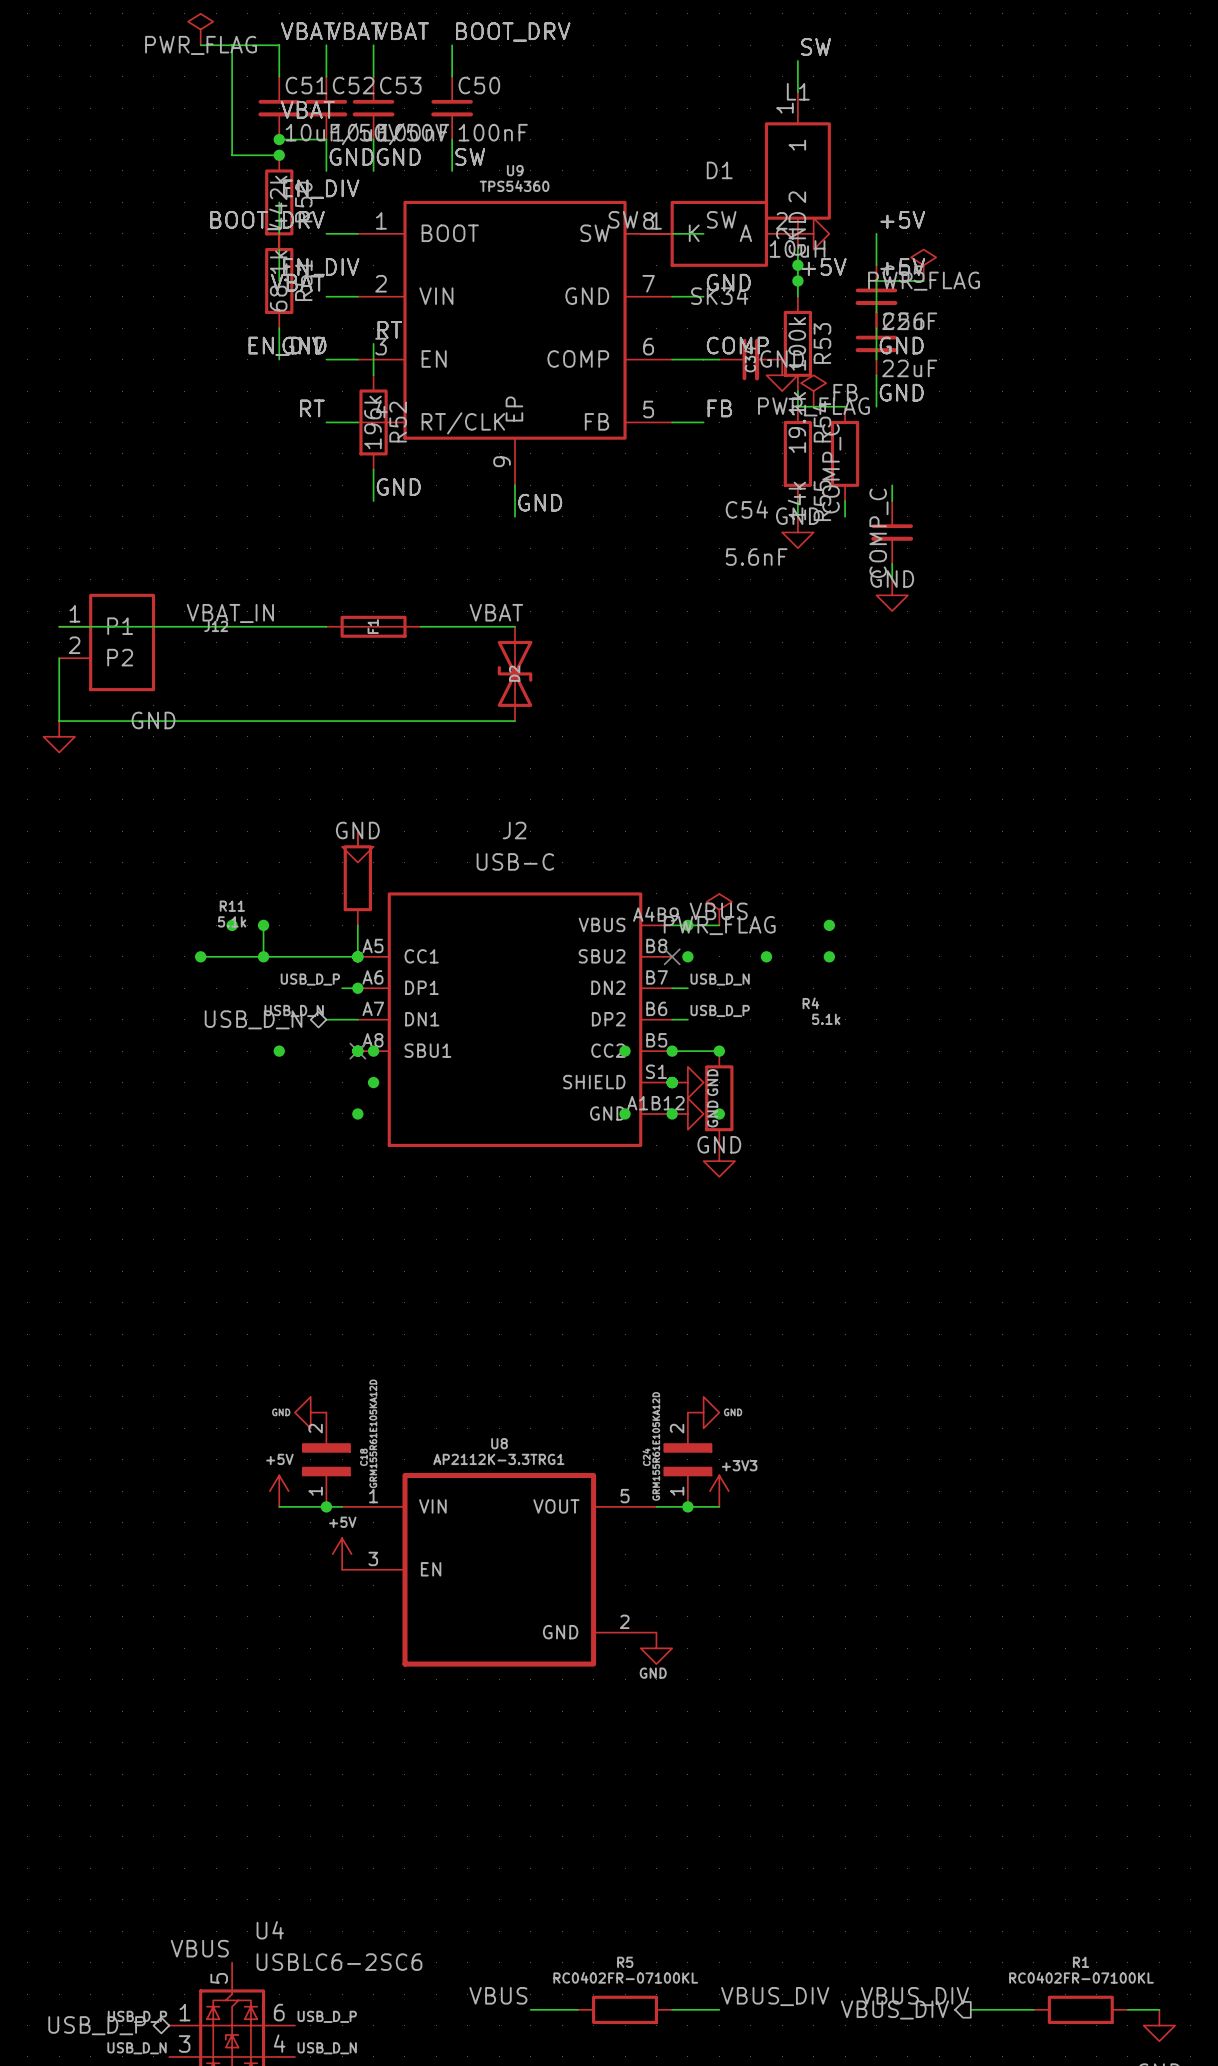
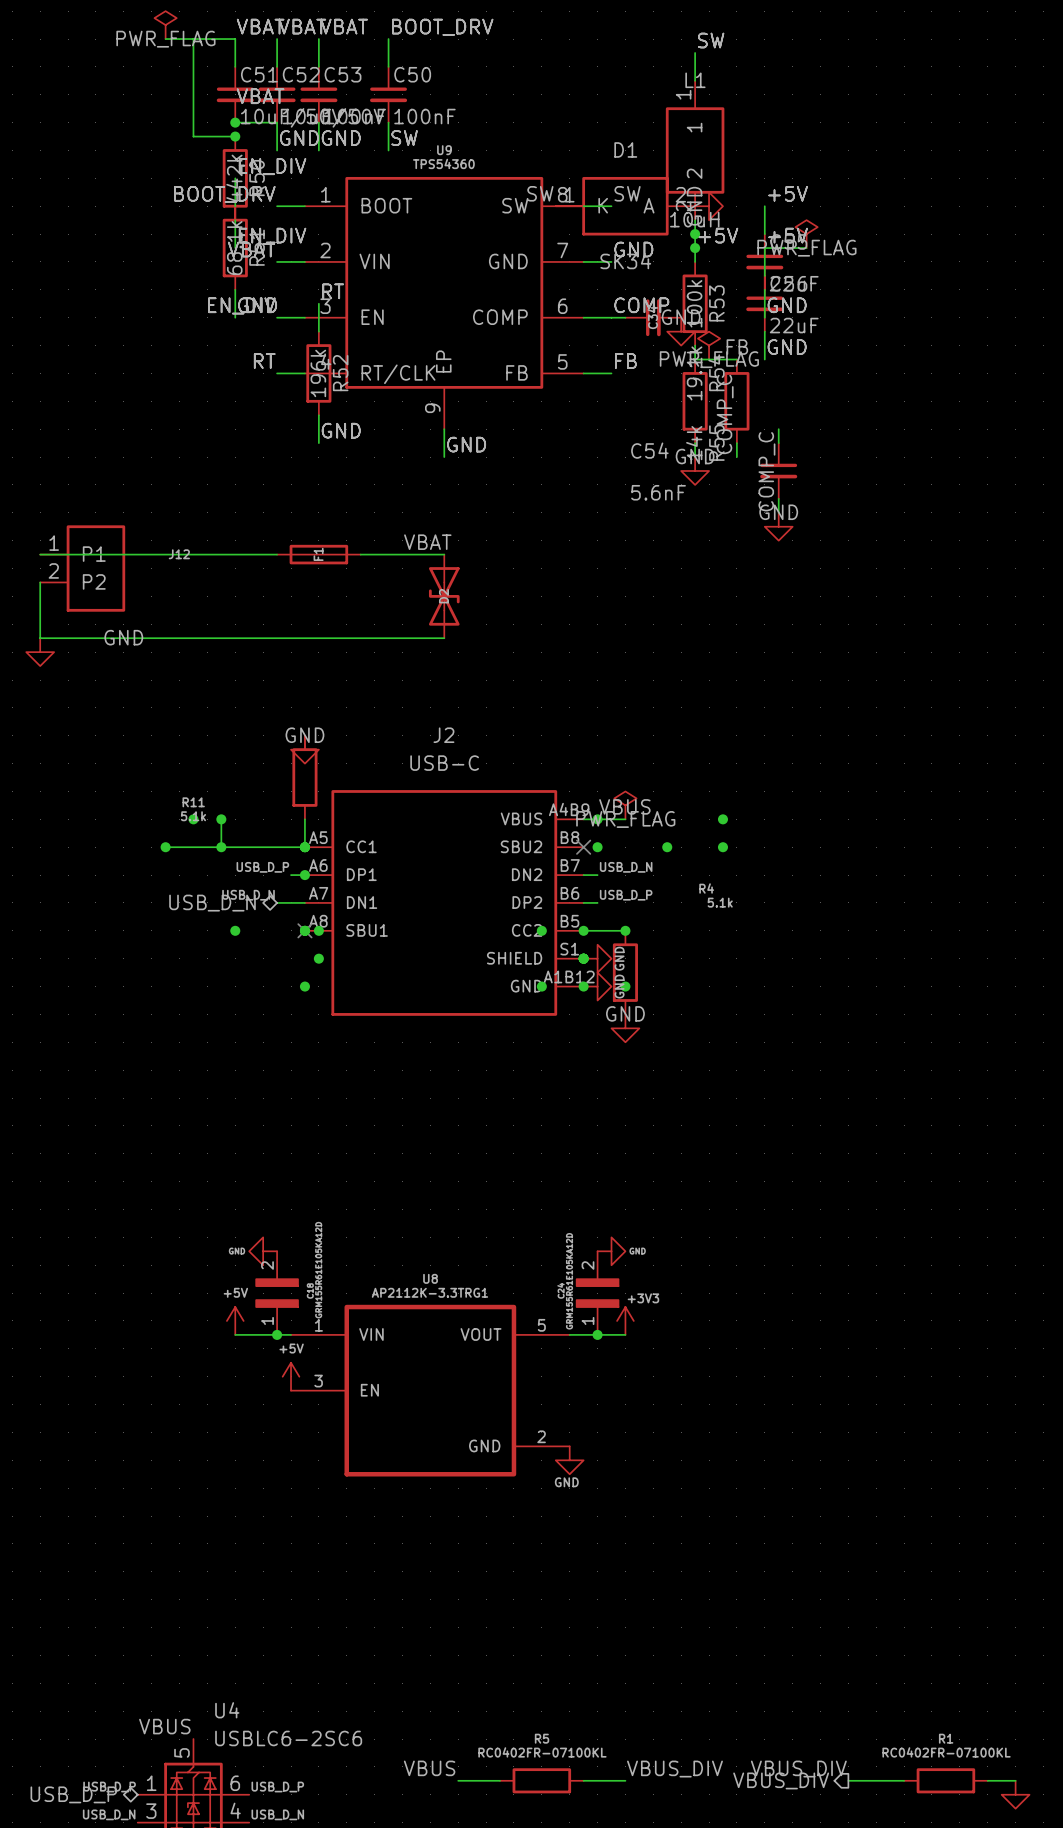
label: VBAT_IN (230, 613) -> none

